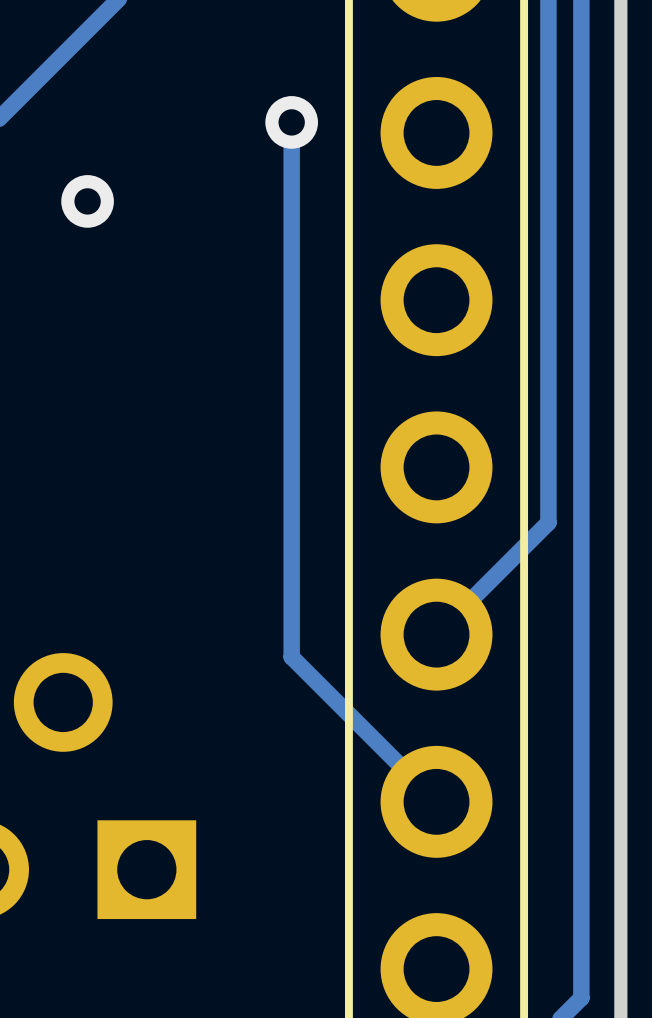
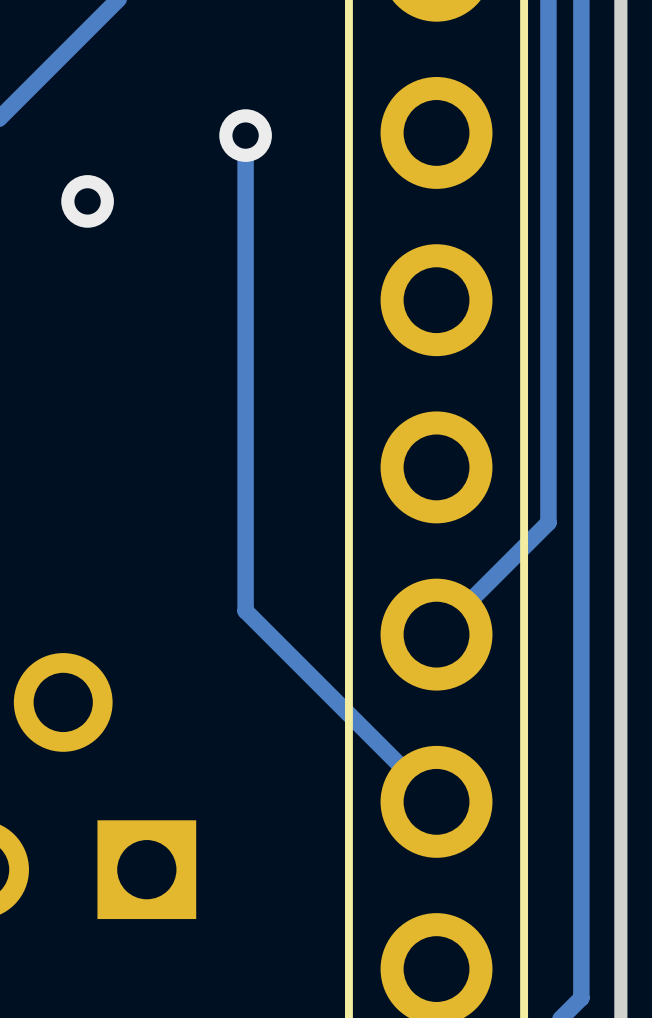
track: (291, 122) (291, 657) -> (245, 135) (245, 610) (291, 657)
via position: (291, 122) -> (245, 135)

